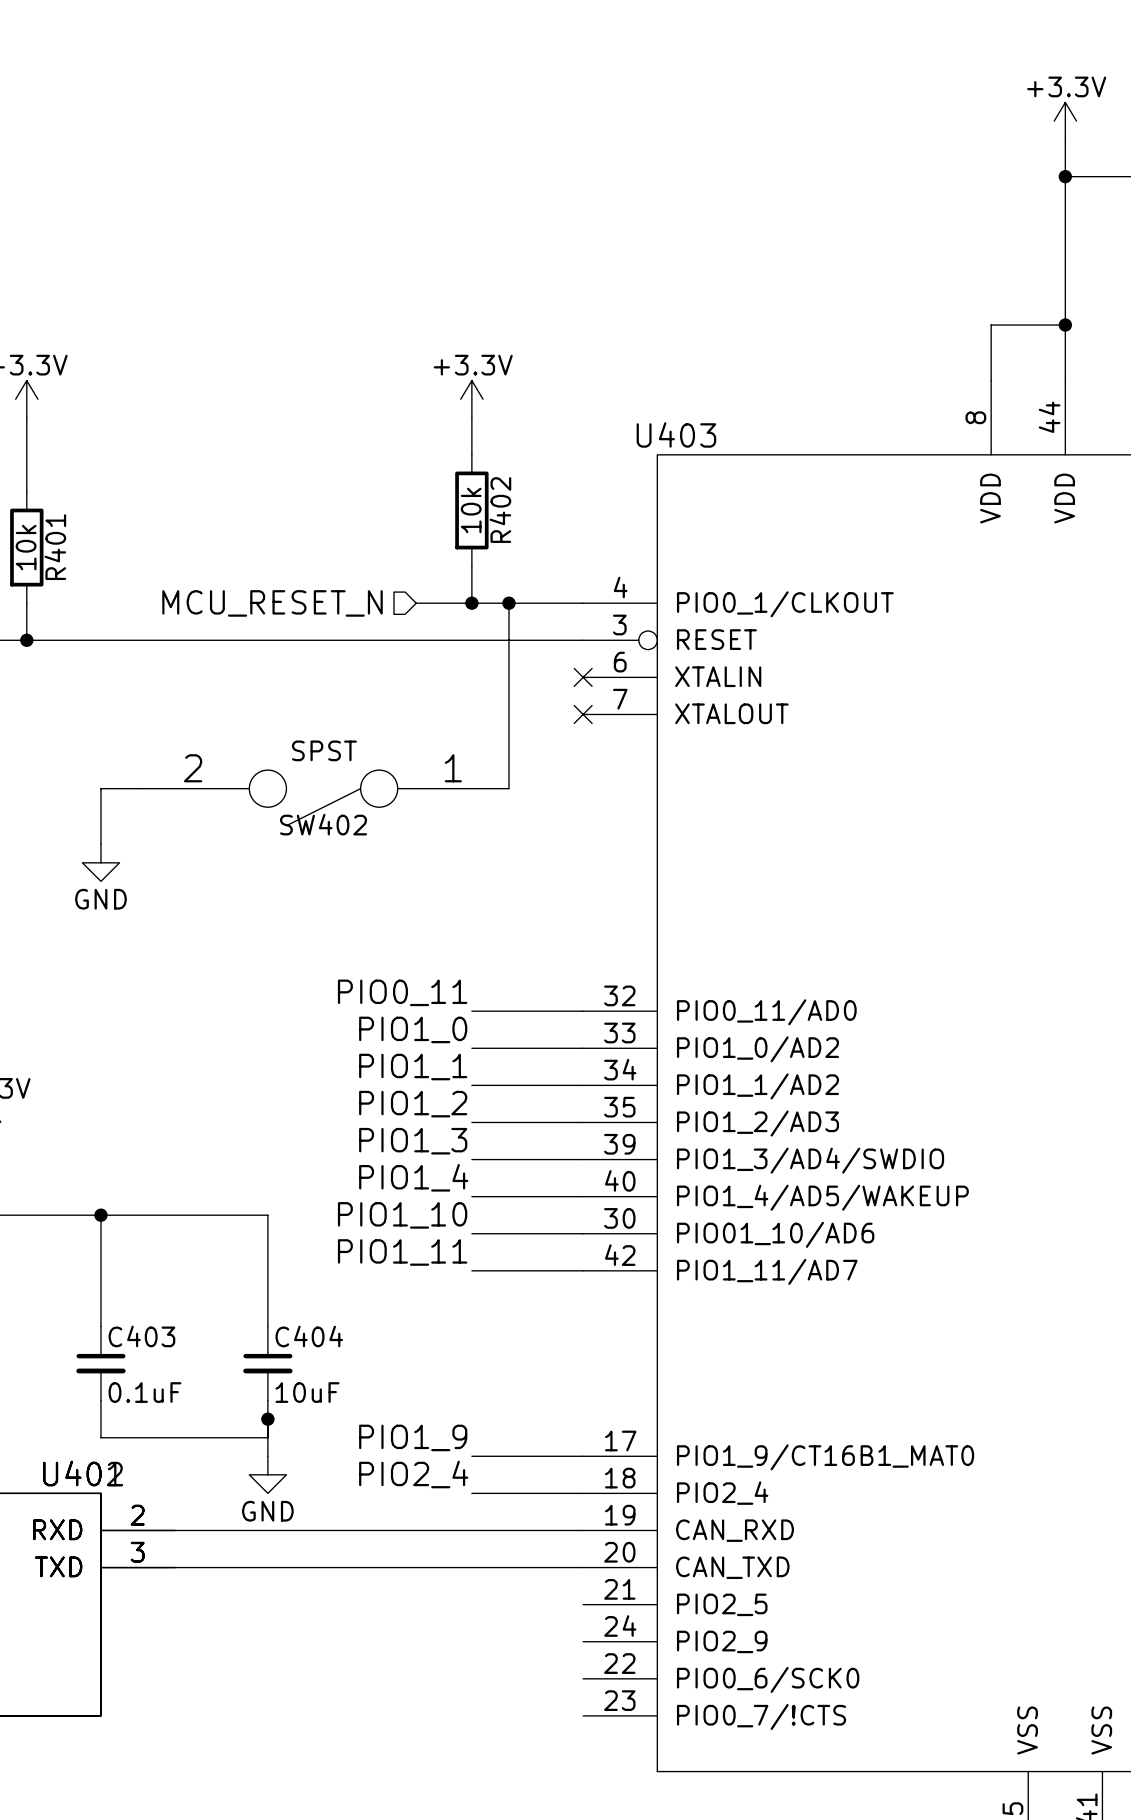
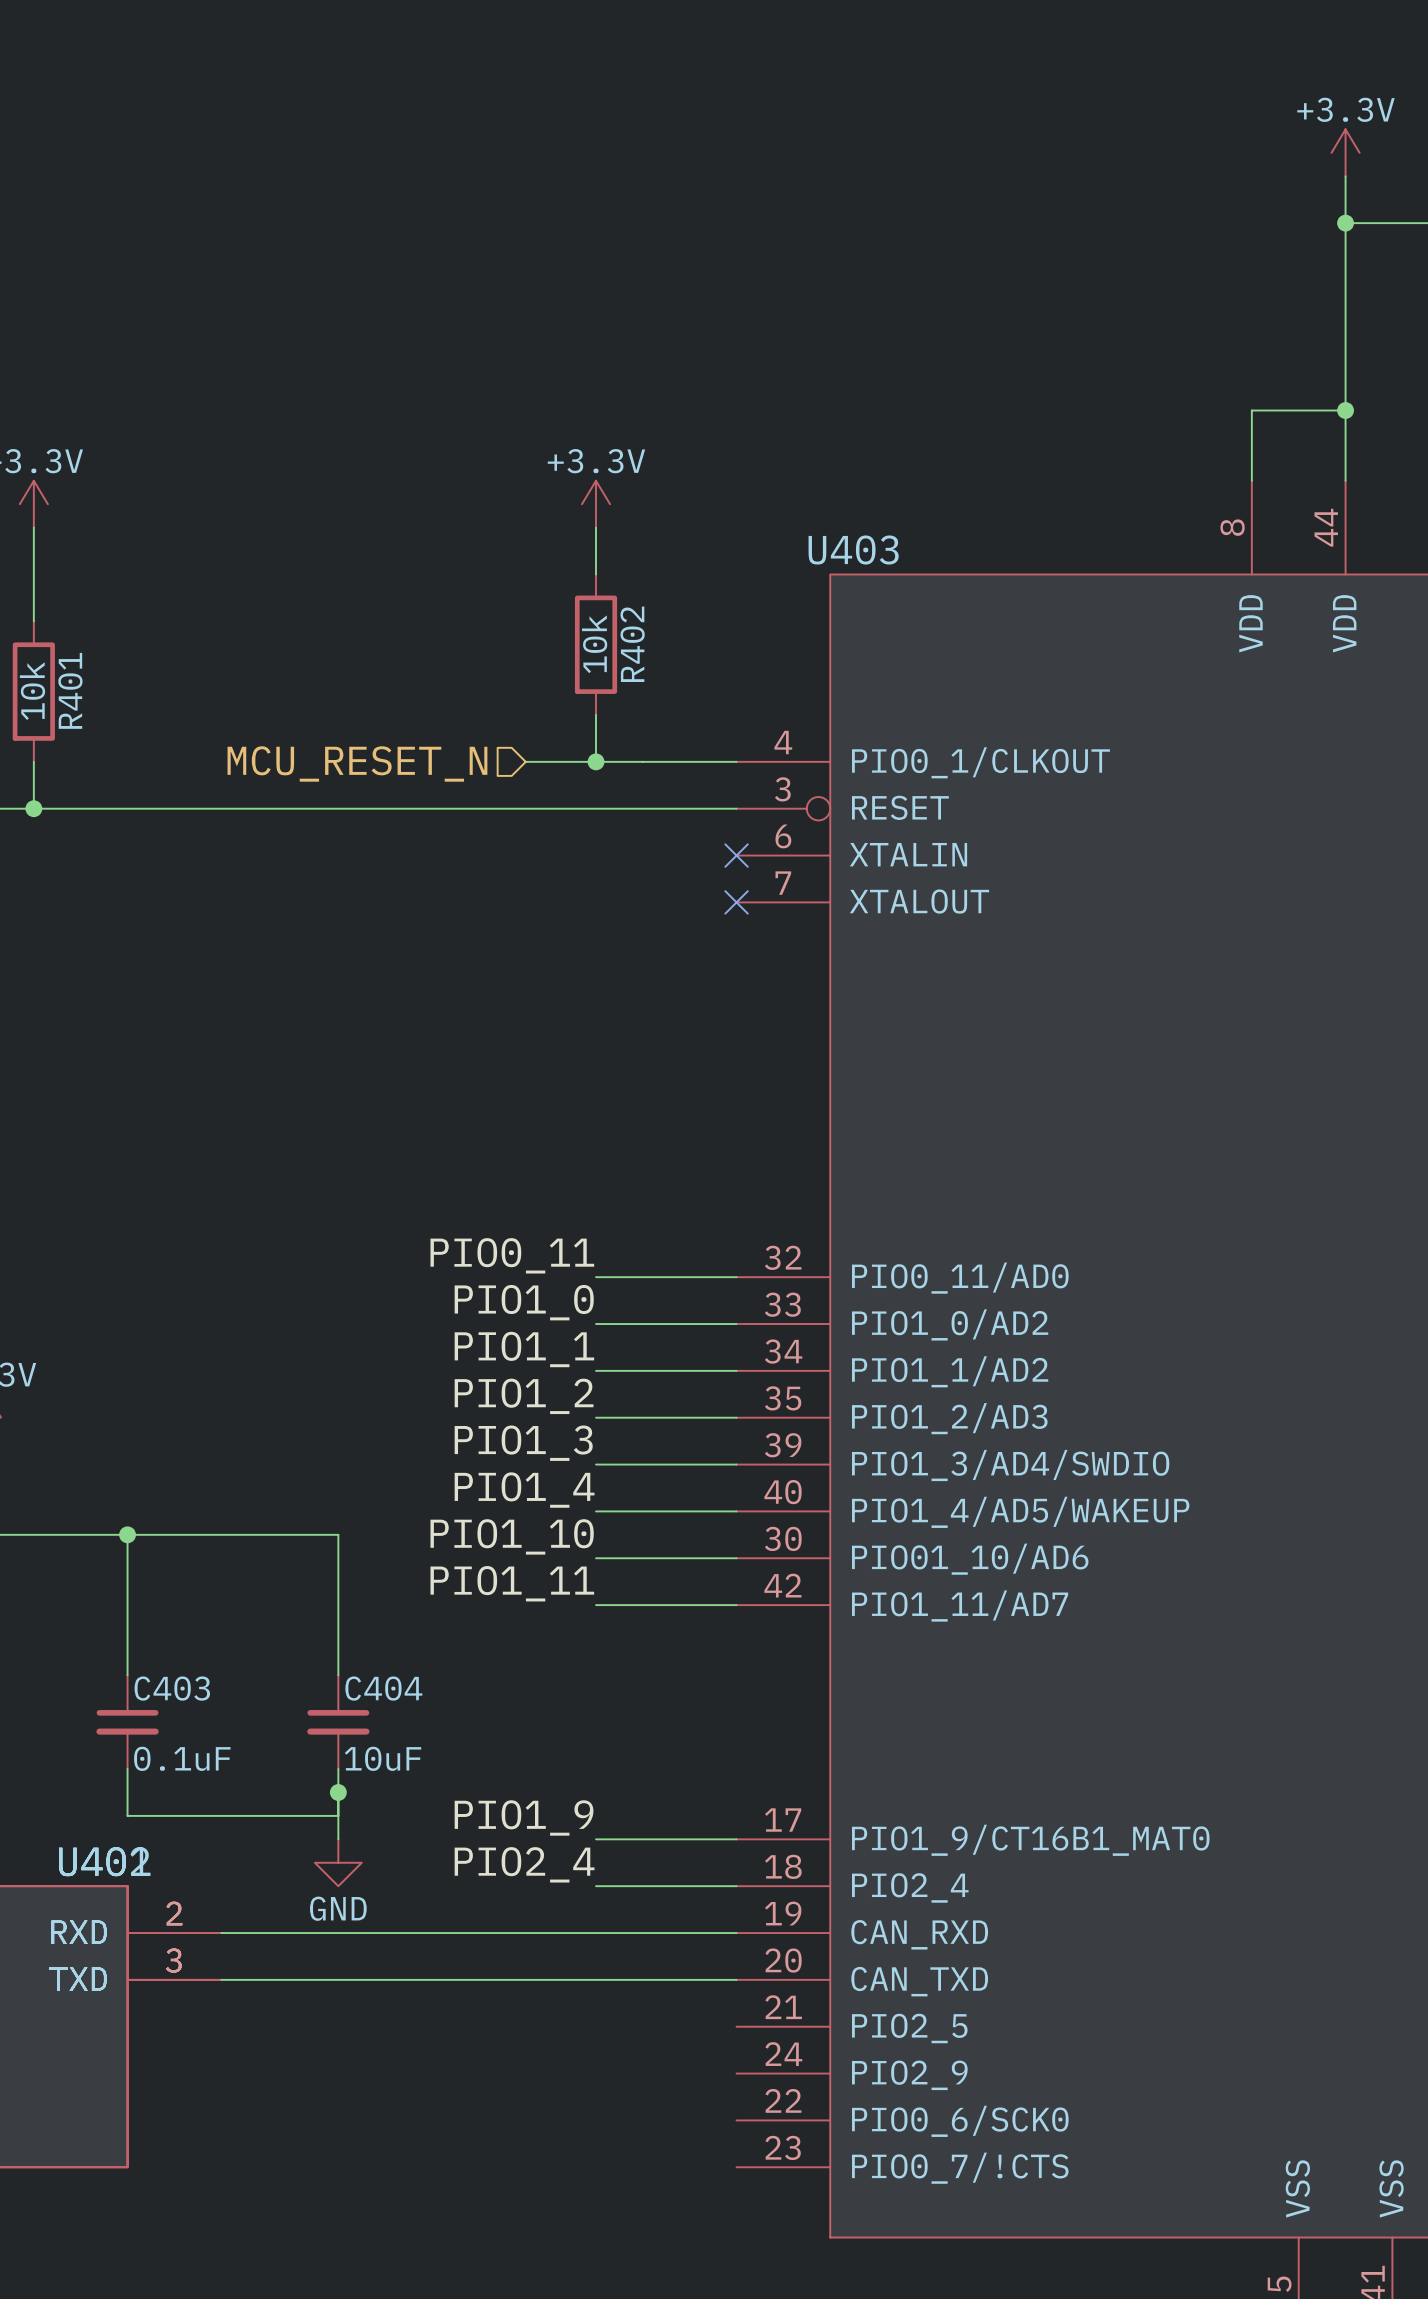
wire: (508, 603) (508, 788) -> none
junction: (508, 603) -> none
wire: (138, 788) (100, 788) (100, 844) -> none
SW402: SPST (323, 797) -> none
power symbol: GND (100, 862) -> none

